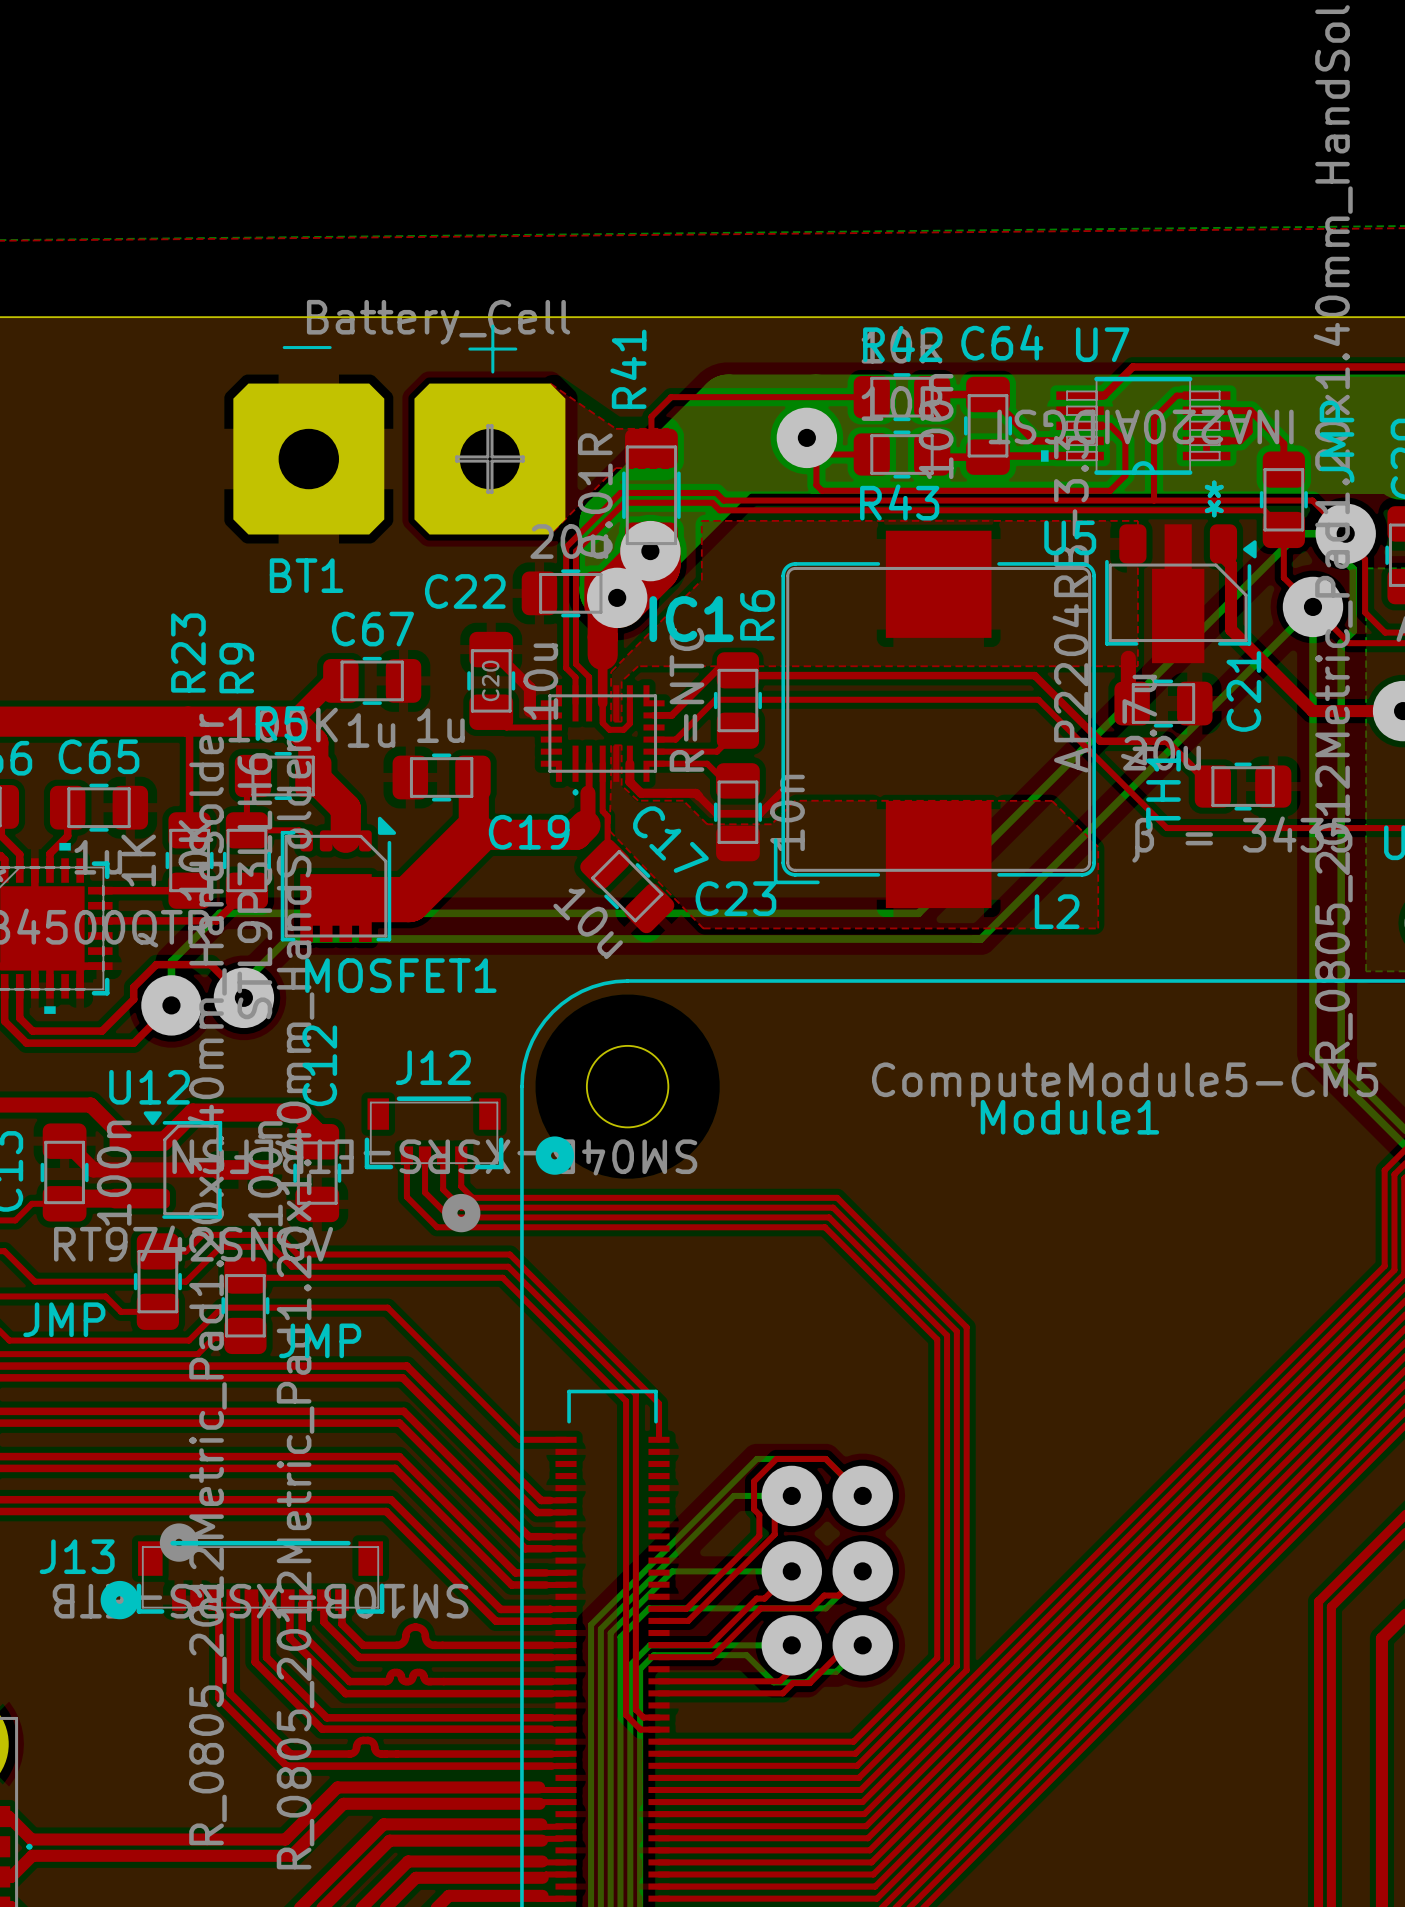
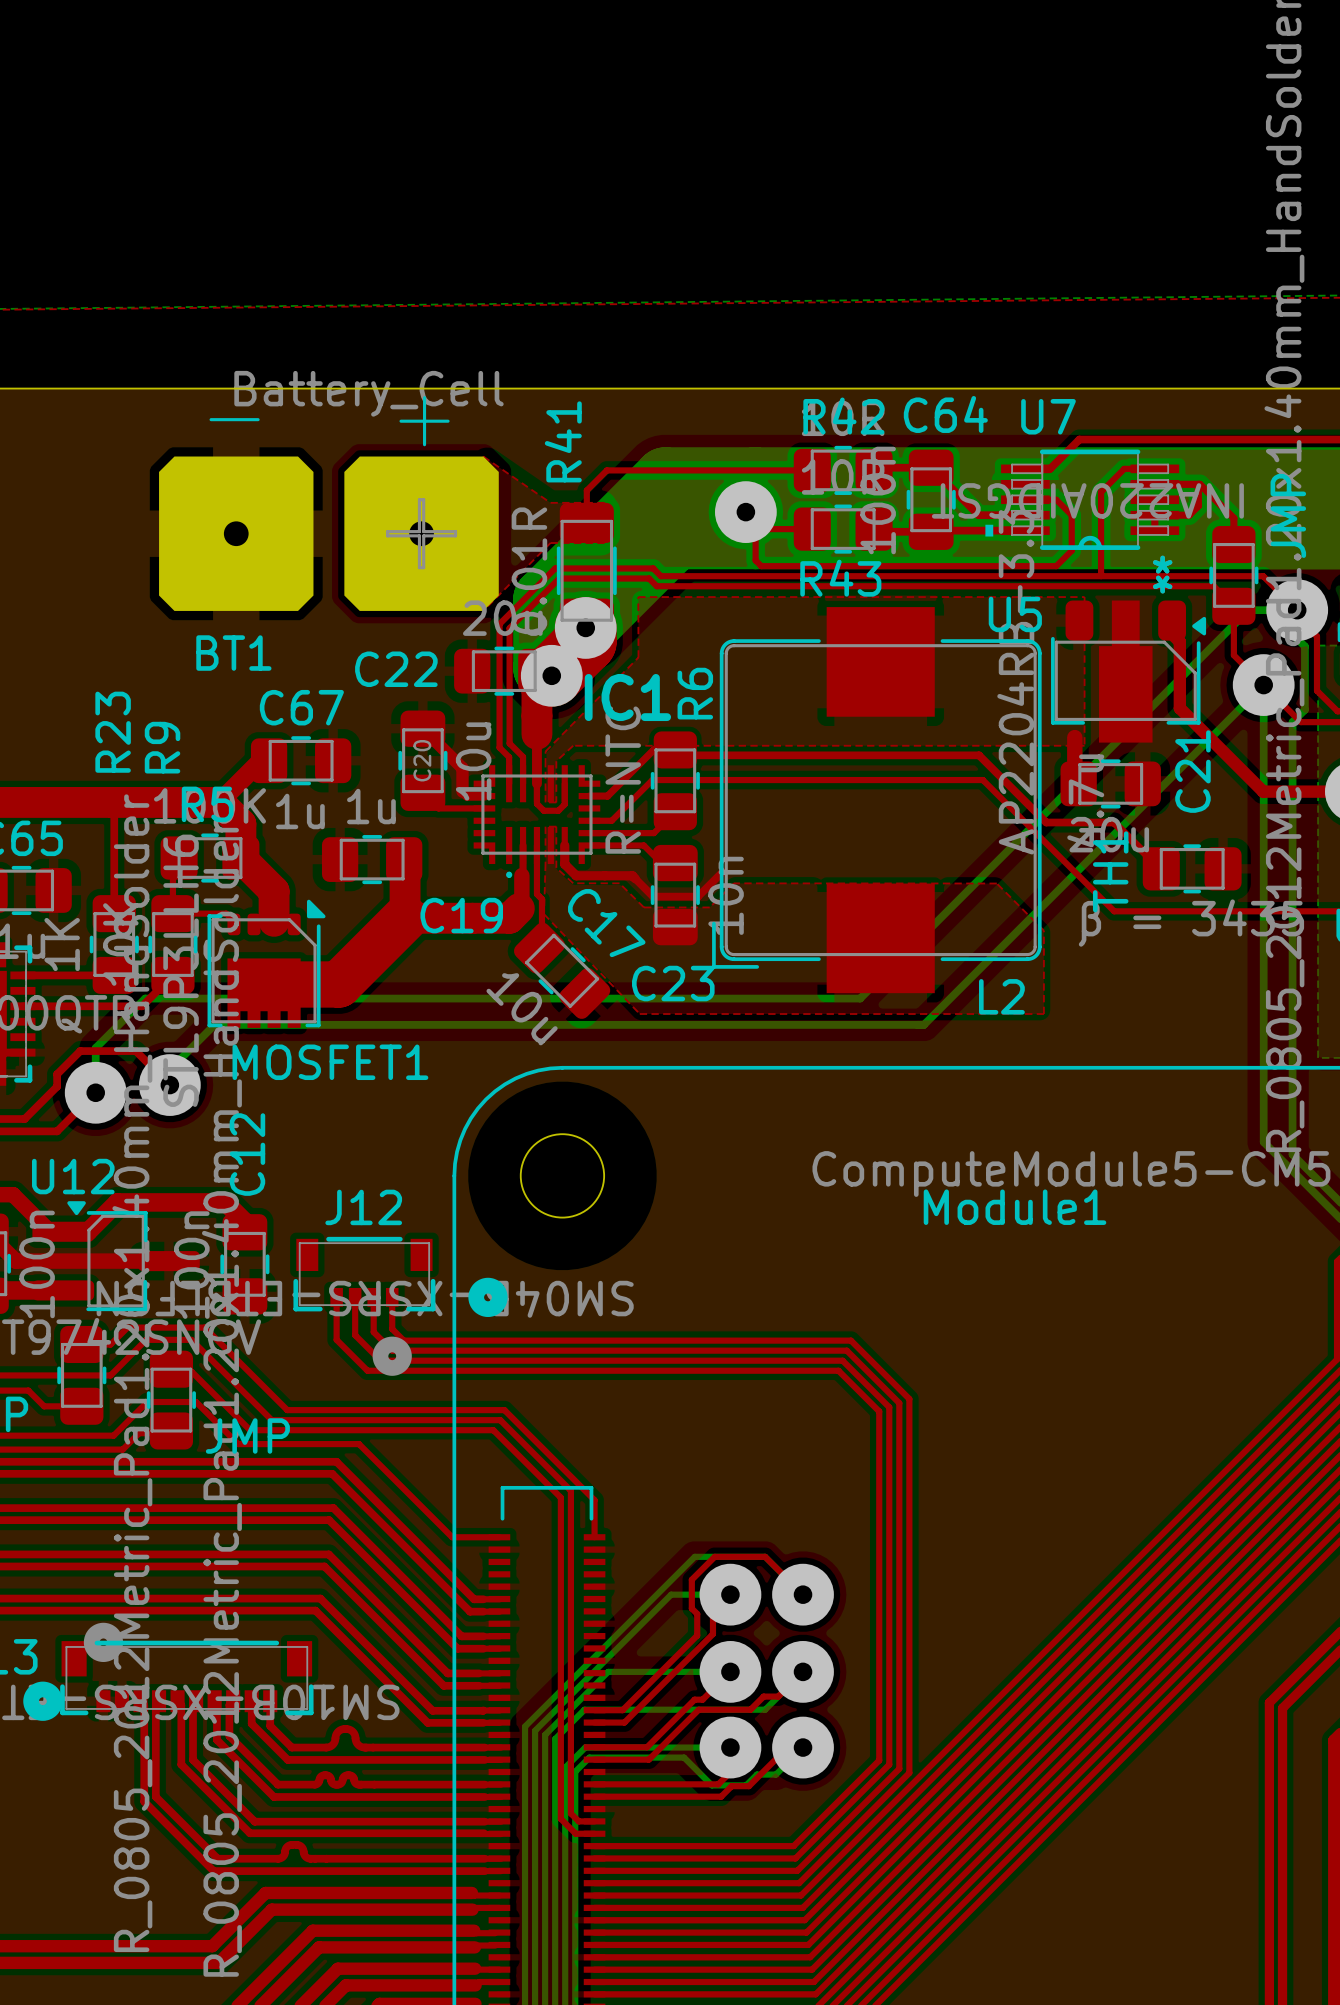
BT1 footprint: [233, 383, 566, 535] -> [159, 456, 499, 611]
top track: (406, 1155) (406, 1197) (437, 1227) (825, 1227) (937, 1339) -> (336, 1297) (336, 1339) (367, 1370) (838, 1370) (879, 1411) (879, 1434)
top track: (425, 1155) (425, 1192) (449, 1217) (829, 1217) (947, 1335) -> (355, 1297) (355, 1335) (380, 1360) (842, 1360) (889, 1407) (889, 1430)
top track: (443, 1155) (443, 1189) (461, 1207) (833, 1207) (956, 1331) -> (373, 1297) (373, 1332) (392, 1350) (846, 1350) (899, 1403) (899, 1426)
top track: (461, 1155) (461, 1186) (472, 1197) (837, 1197) (966, 1327) -> (392, 1297) (392, 1329) (403, 1340) (851, 1340) (909, 1398) (909, 1422)
J12 position: (469, 1164) -> (400, 1306)
top track: (265, 1246) (271, 1246) (291, 1266) (508, 1266) (566, 1325) -> (191, 1339) (271, 1420) (500, 1420)
top track: (297, 1254) (509, 1254) (570, 1315) -> (224, 1347) (287, 1410) (504, 1410)
top track: (264, 1277) (502, 1277) (560, 1335) -> (191, 1371) (250, 1430) (493, 1430)
top track: (269, 1307) (387, 1307) (428, 1348) -> (196, 1402) (238, 1444) (359, 1444)

